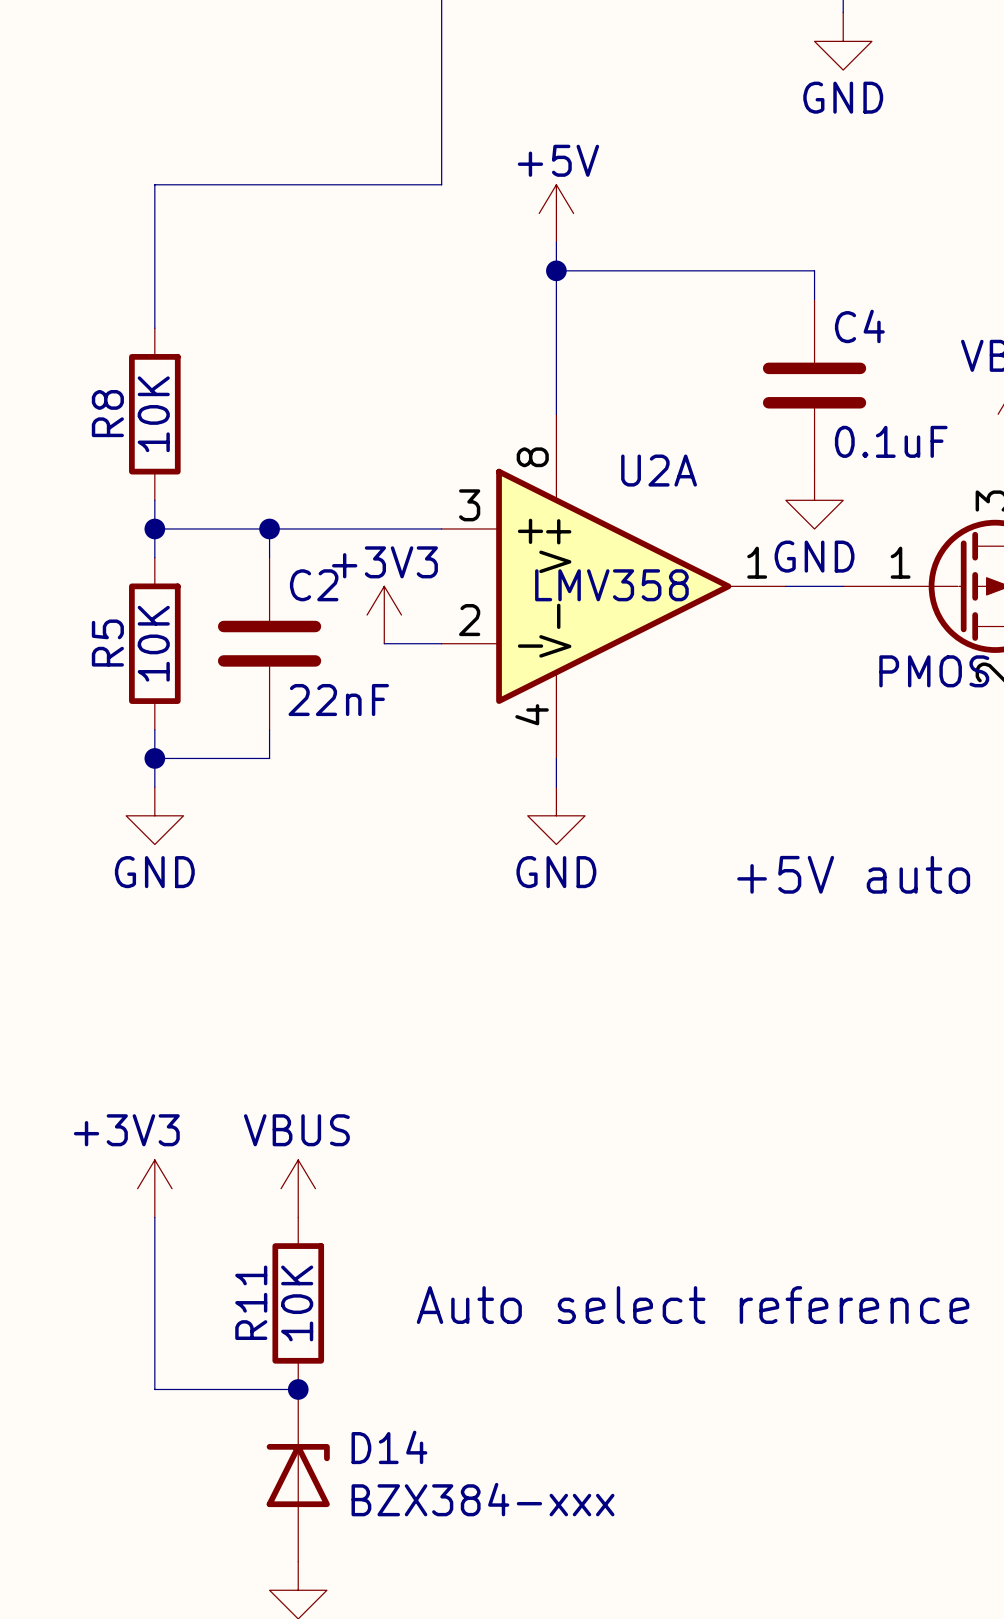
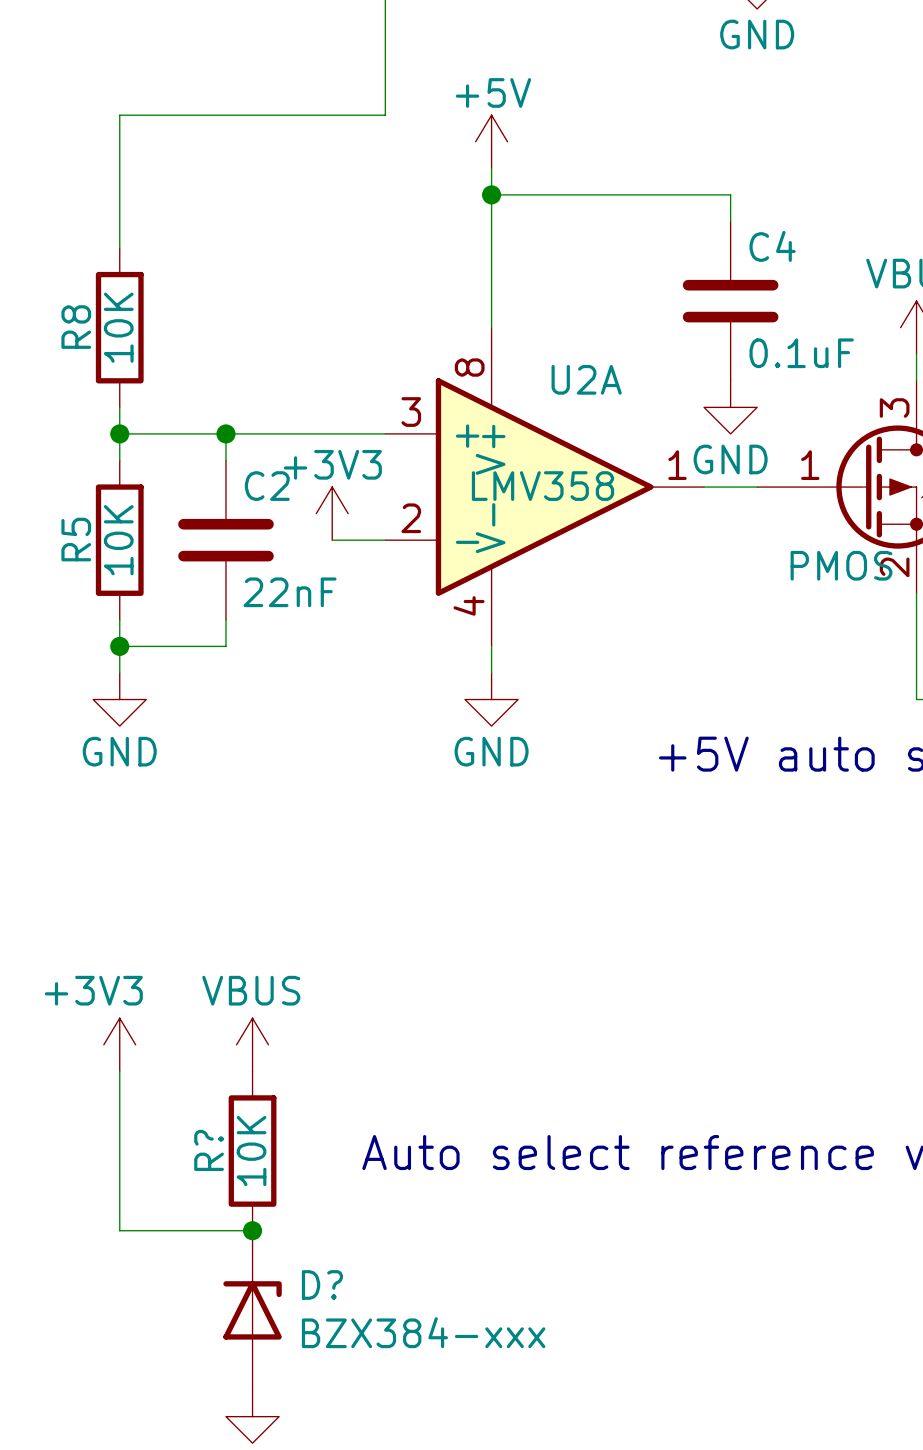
R11 name: R11 (251, 1302) -> R? (209, 1150)
D14 name: D14 (389, 1447) -> D? (322, 1284)

